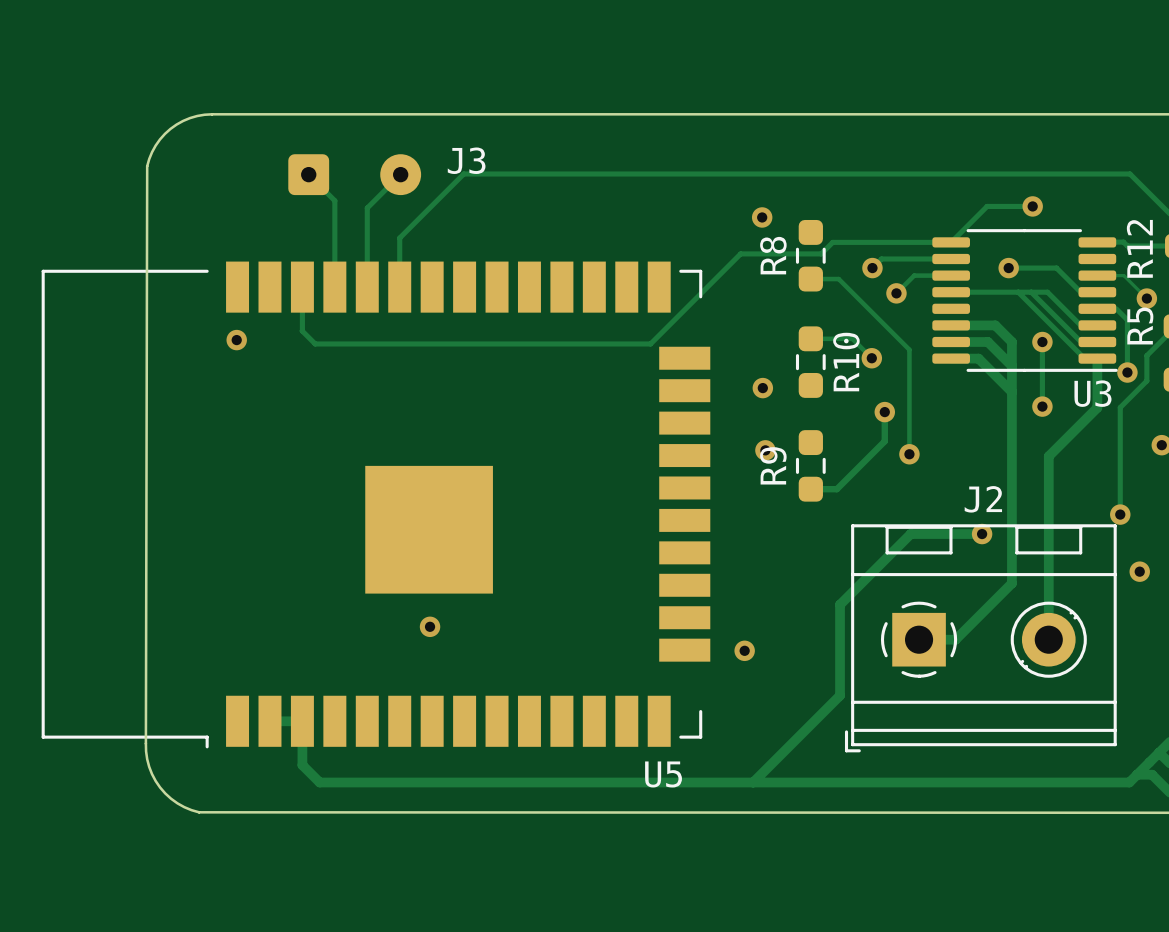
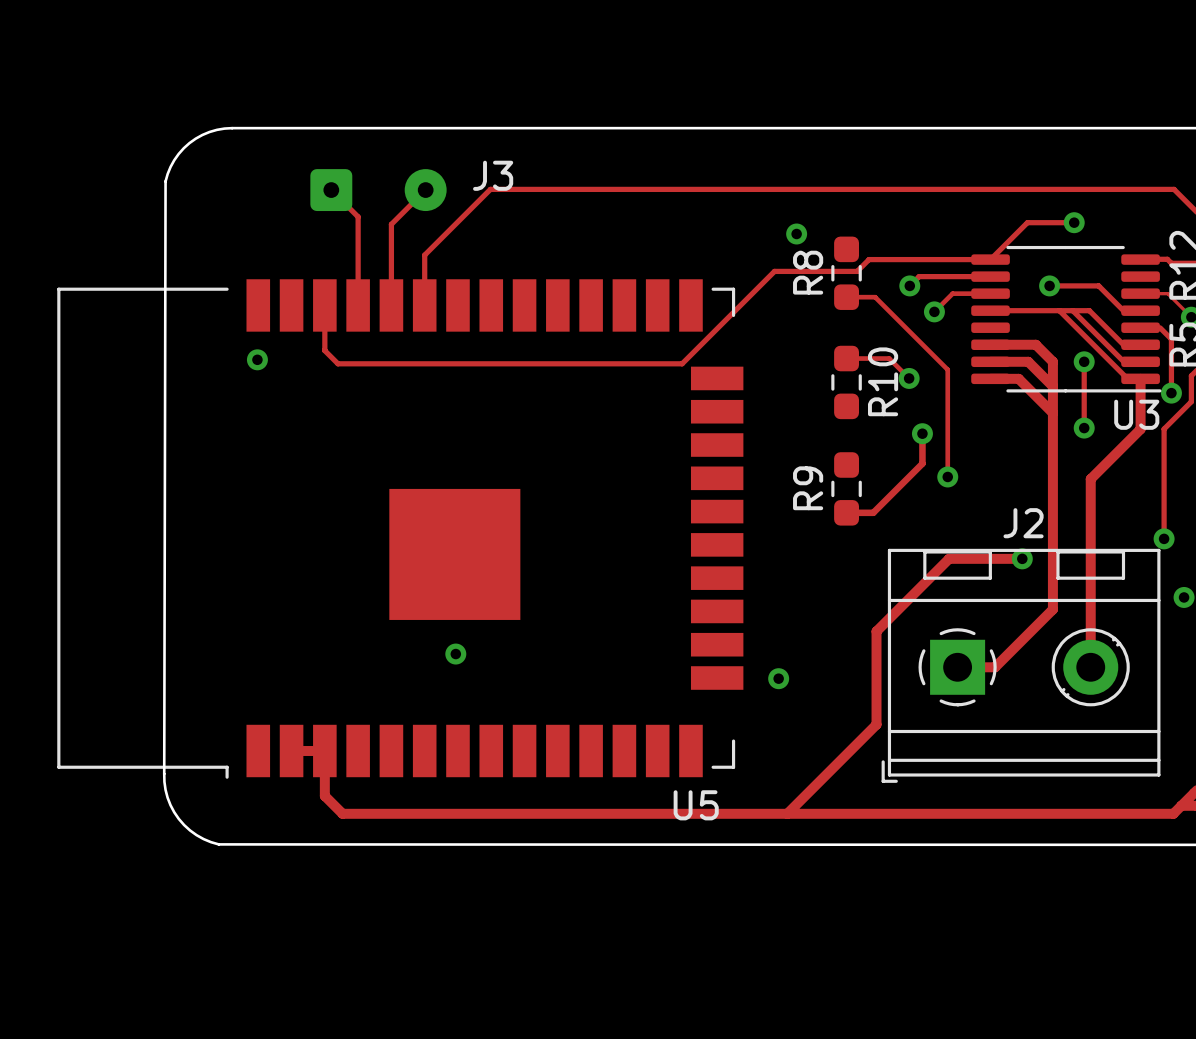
via: (762, 388) -> none
via: (765, 450) -> none

